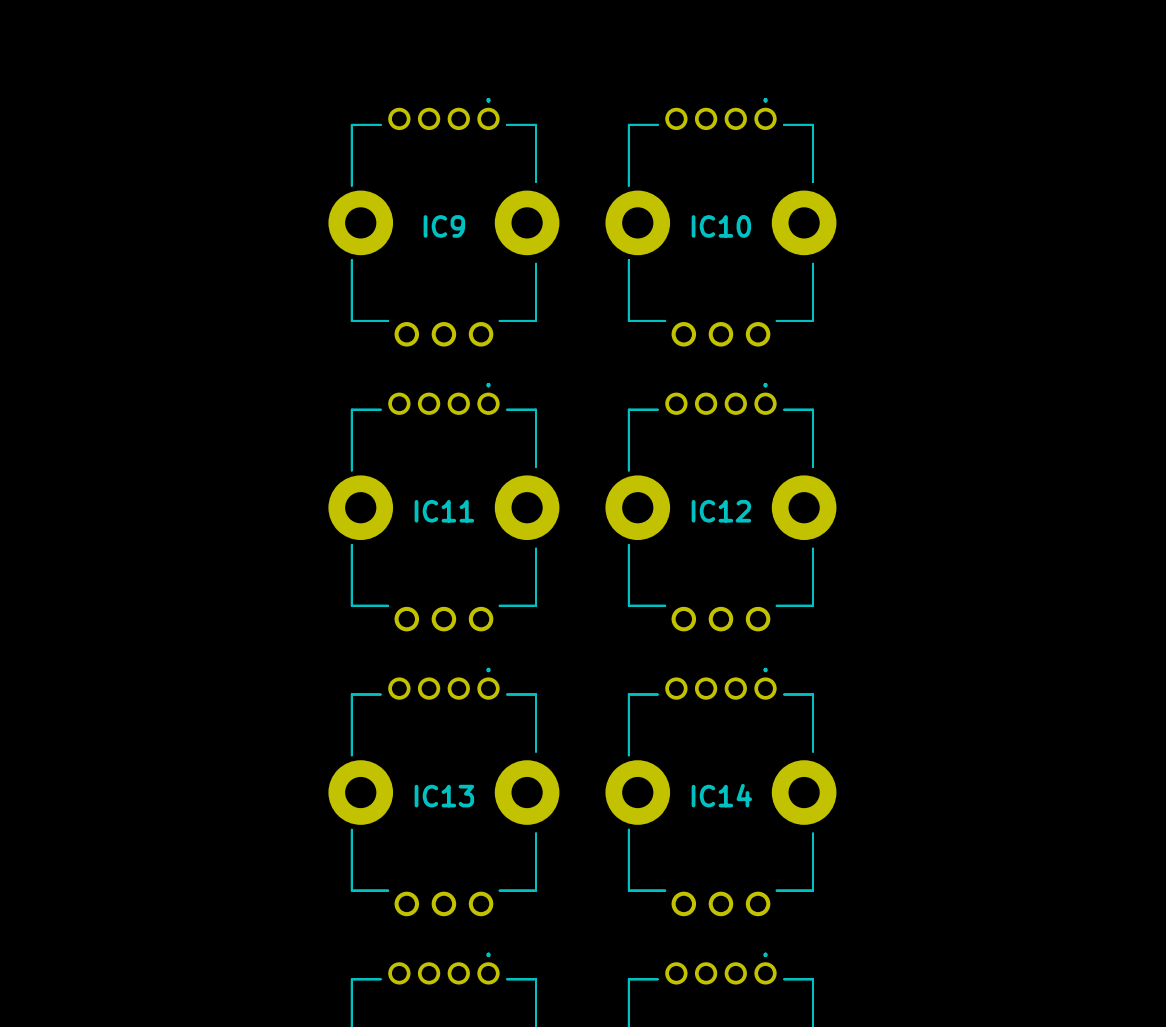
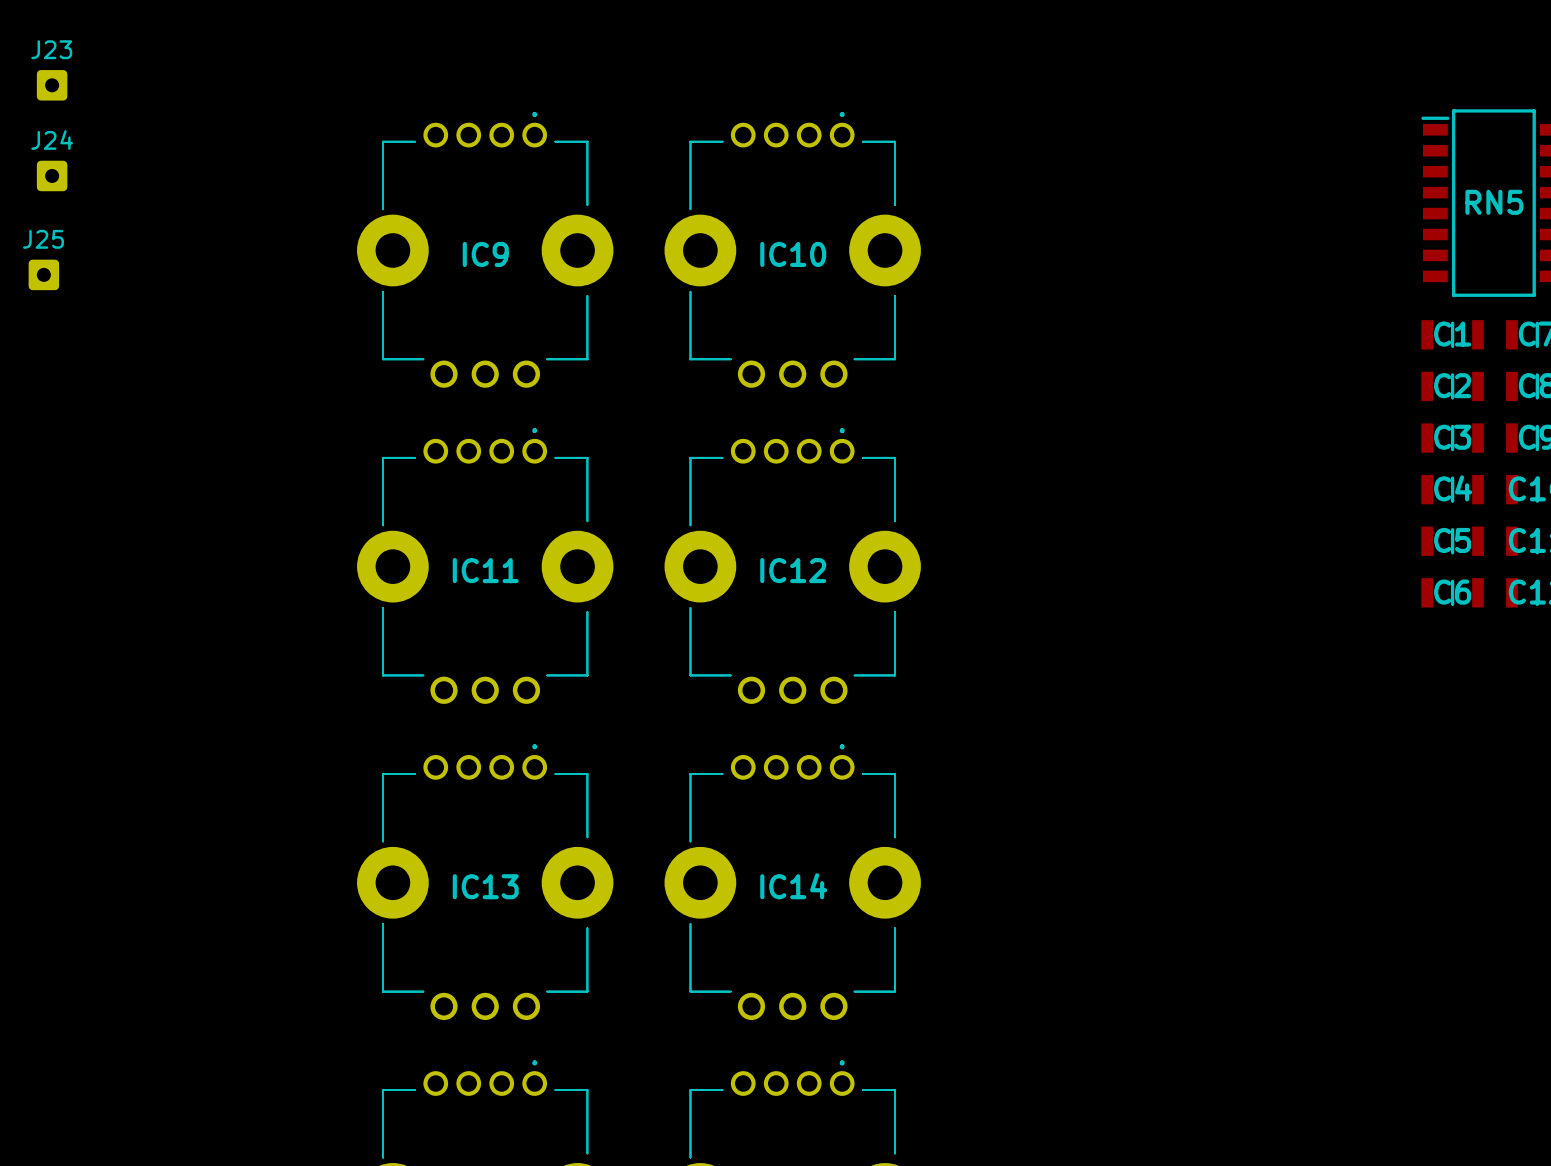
J23: none -> (52, 85)
J24: none -> (52, 175)
J25: none -> (43, 274)

